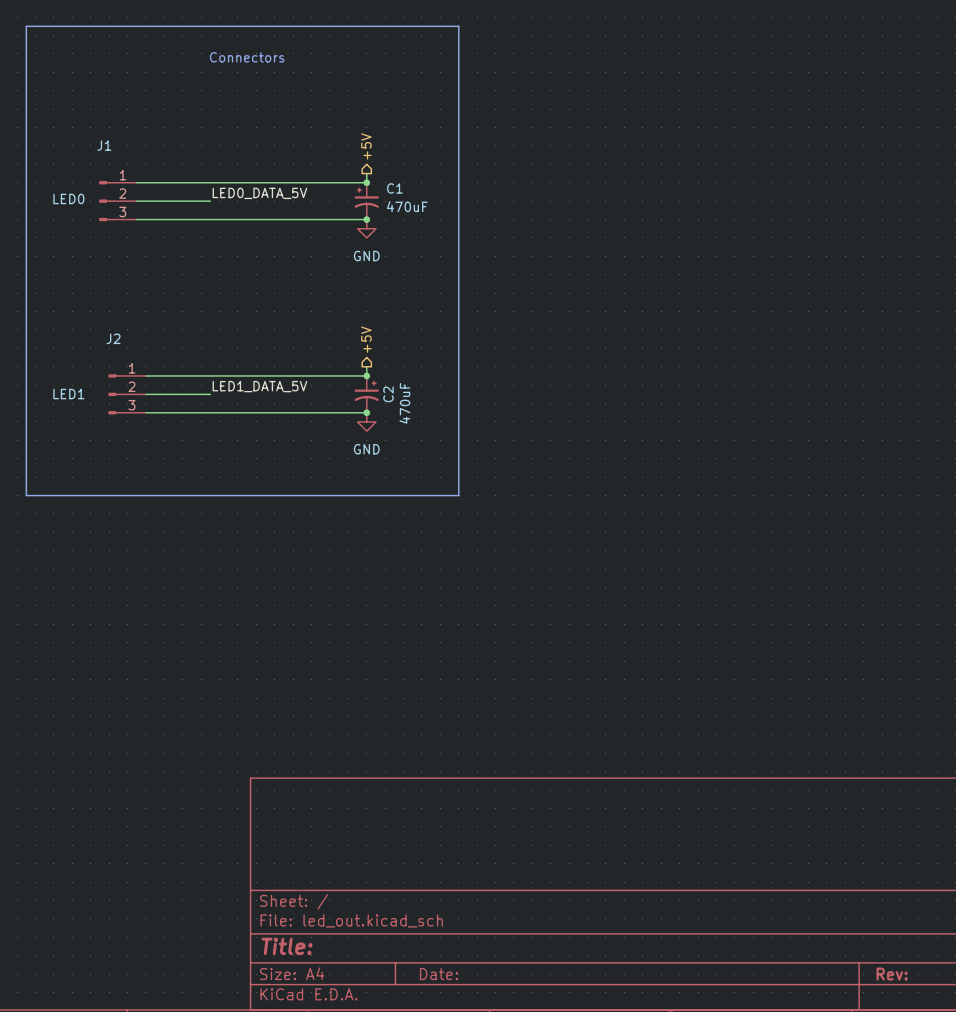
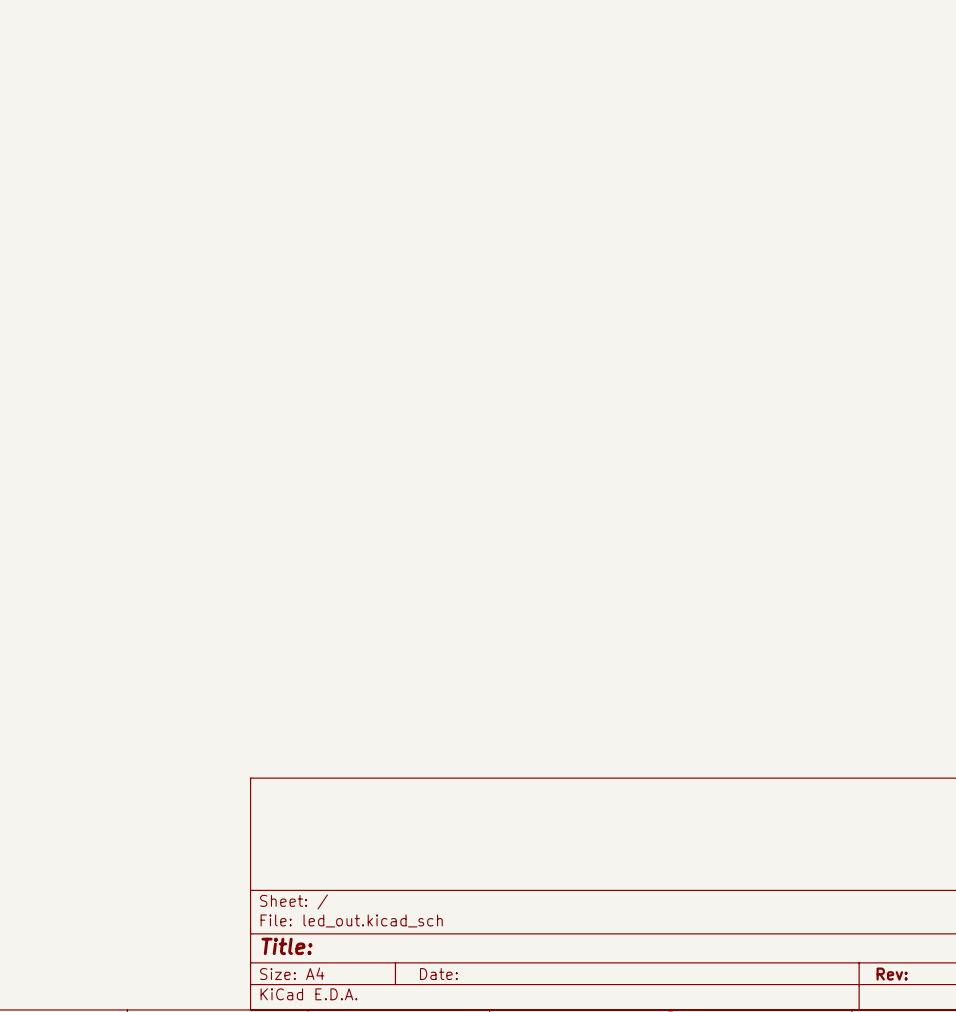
line: (26, 26) (458, 26) (458, 495) (26, 495) (26, 26) -> none
text: Connectors (247, 57) -> none
hierarchical label: +5V (366, 146) -> none
wire: (366, 173) (366, 182) (136, 182) -> none
junction: (366, 182) -> none
label: LED0_DATA_5V (259, 193) -> none
J1: LED0 (118, 201) -> none
wire: (136, 201) (210, 201) -> none
C1: 470uF (366, 201) -> none
wire: (136, 219) (366, 219) -> none
junction: (366, 219) -> none
power symbol: GND (366, 228) -> none
hierarchical label: +5V (366, 339) -> none
wire: (366, 366) (366, 375) (145, 375) -> none
junction: (366, 375) -> none
label: LED1_DATA_5V (259, 386) -> none
J2: LED1 (127, 394) -> none
wire: (145, 394) (210, 394) -> none
C2: 470uF (366, 394) -> none
wire: (145, 412) (366, 412) -> none
junction: (366, 412) -> none
power symbol: GND (366, 421) -> none

